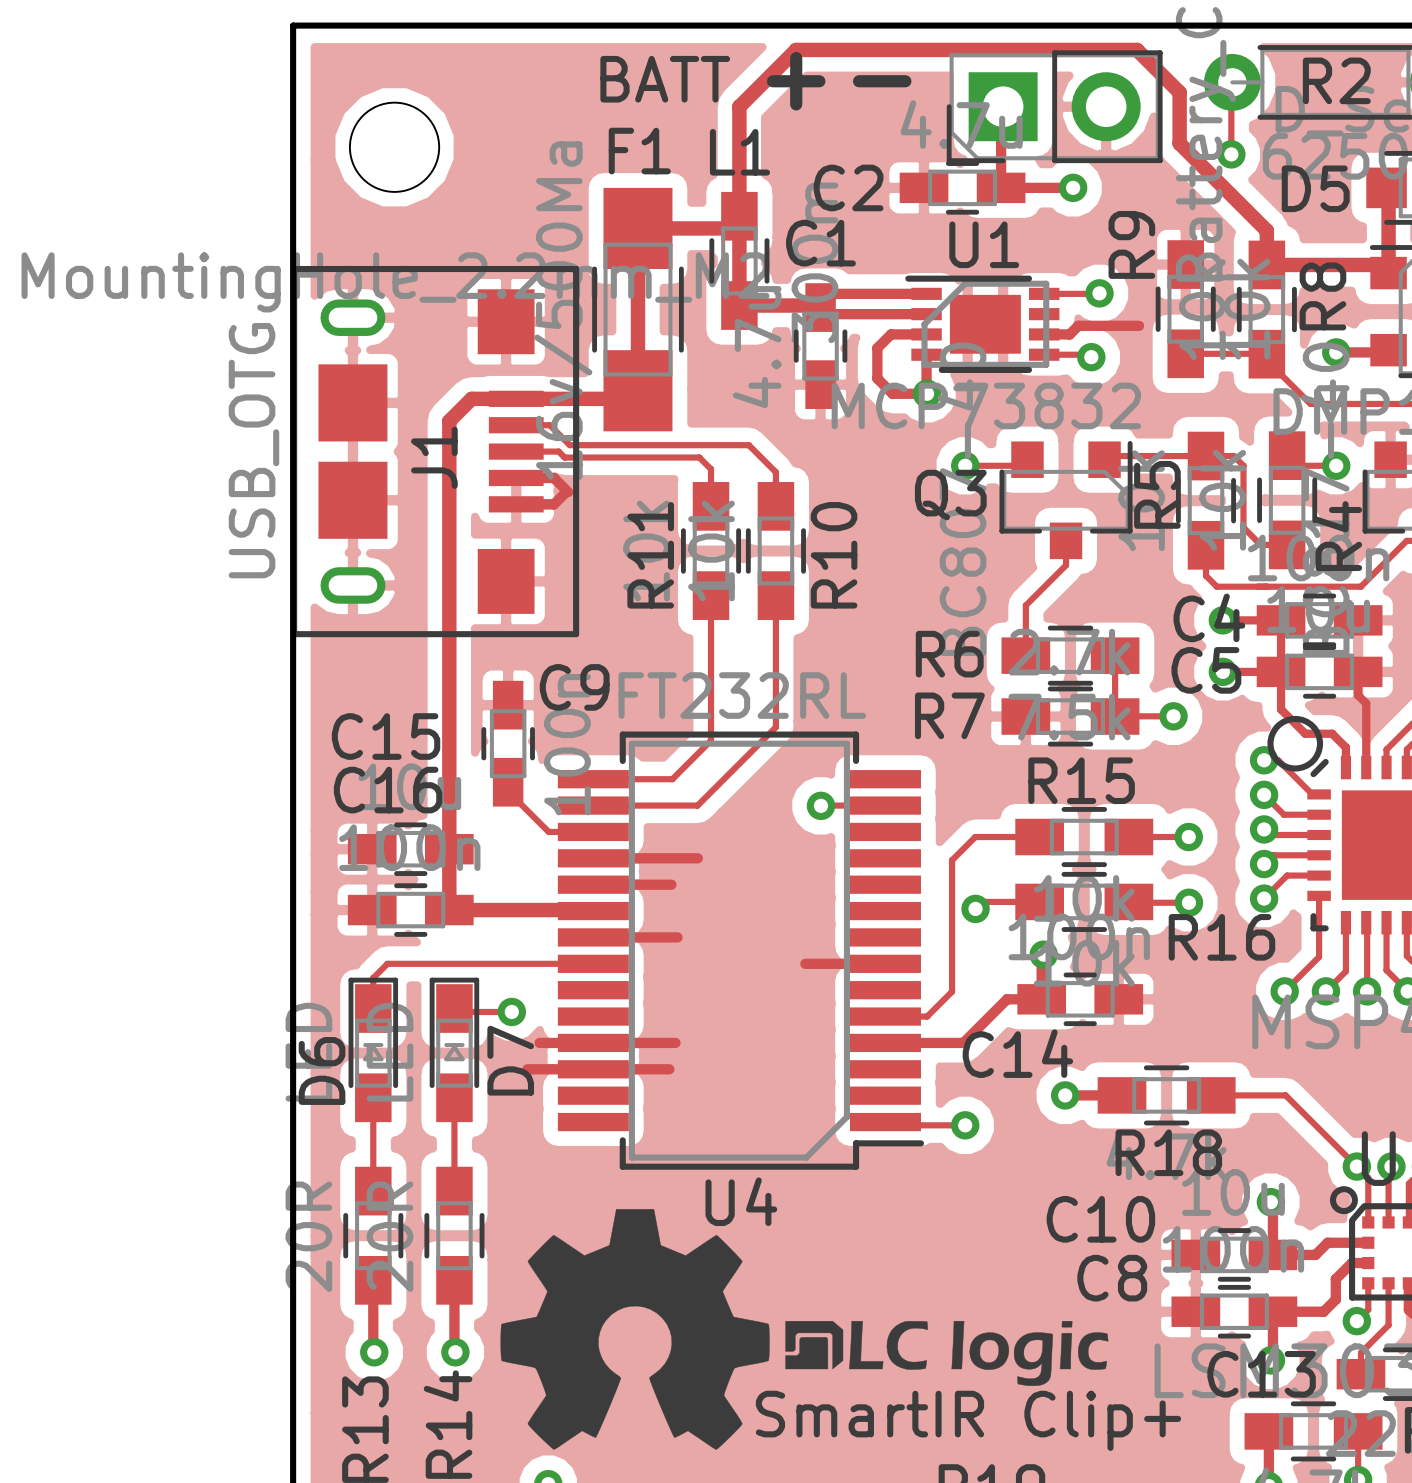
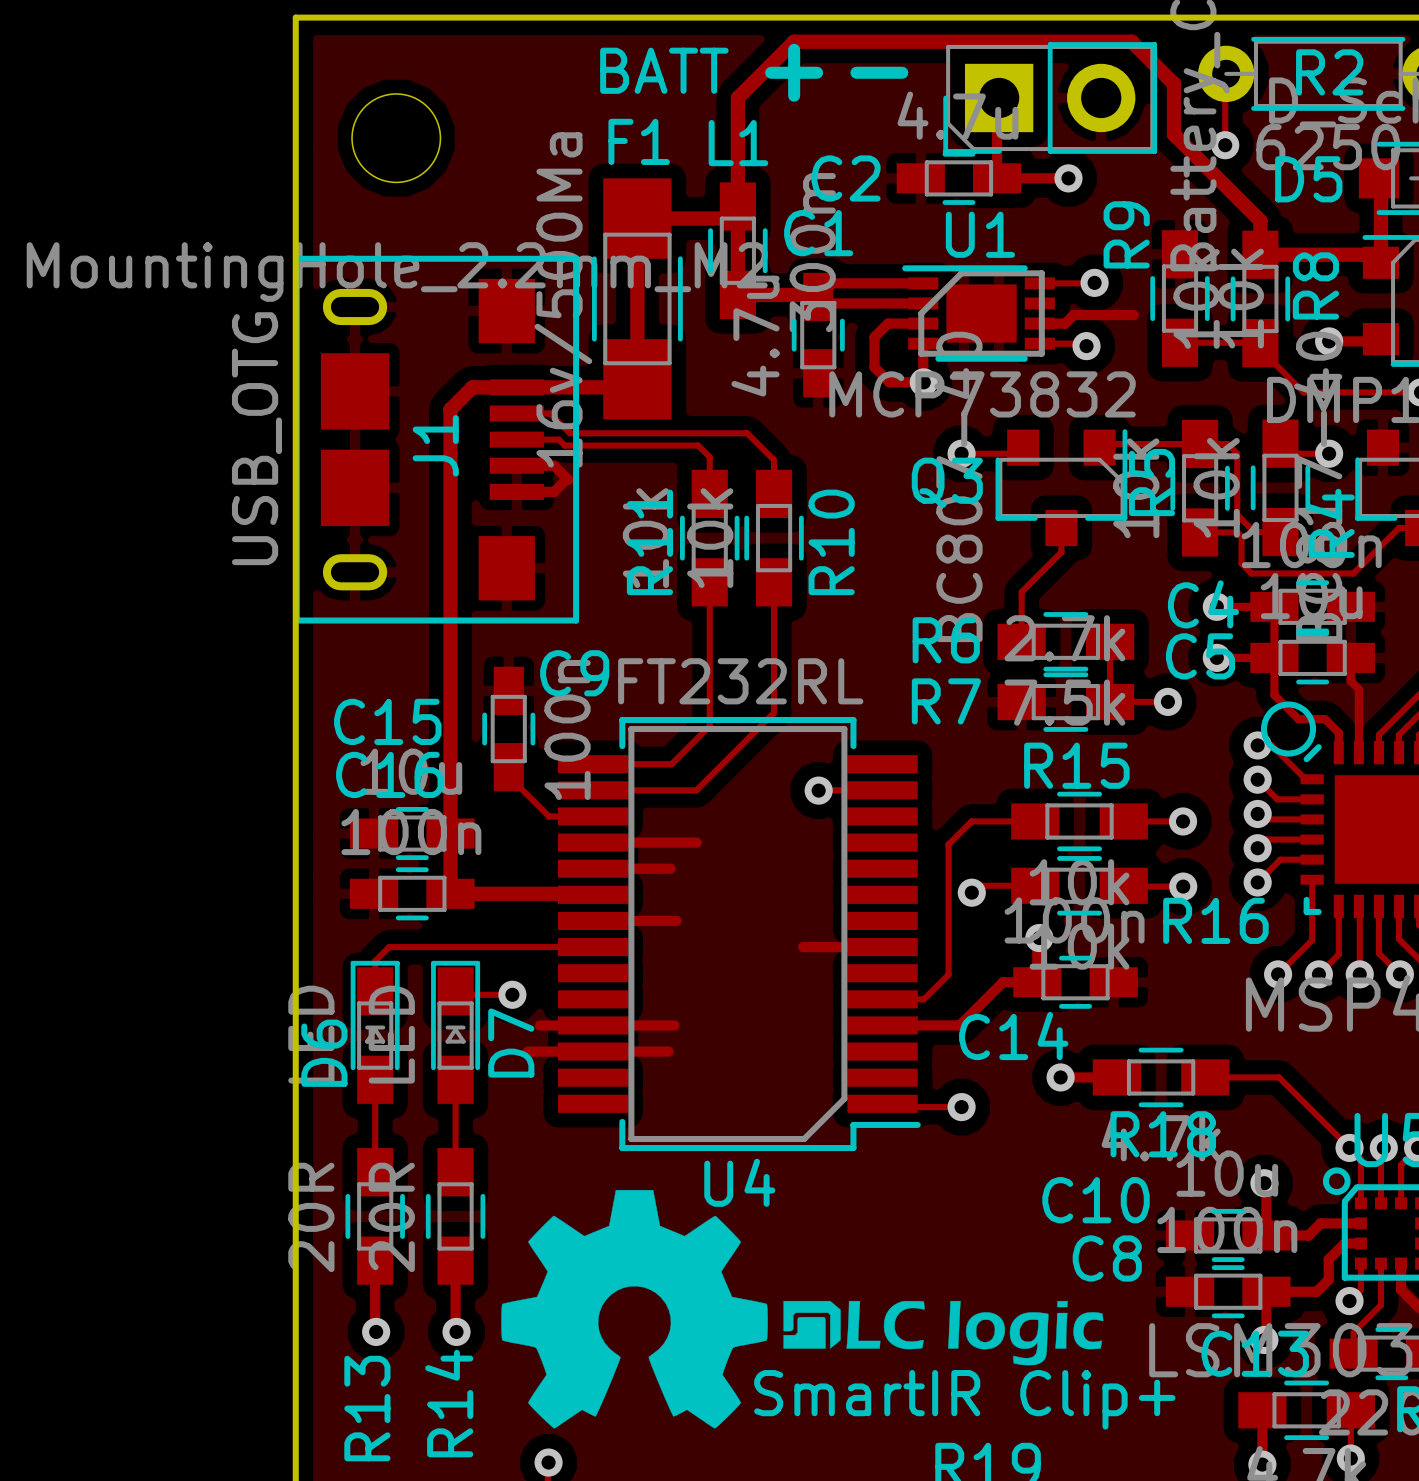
track: (1205, 545) (1205, 575) (1216, 586) (1257, 586) -> (1200, 532) (1237, 532) (1241, 536) (1241, 563) (1251, 573)

